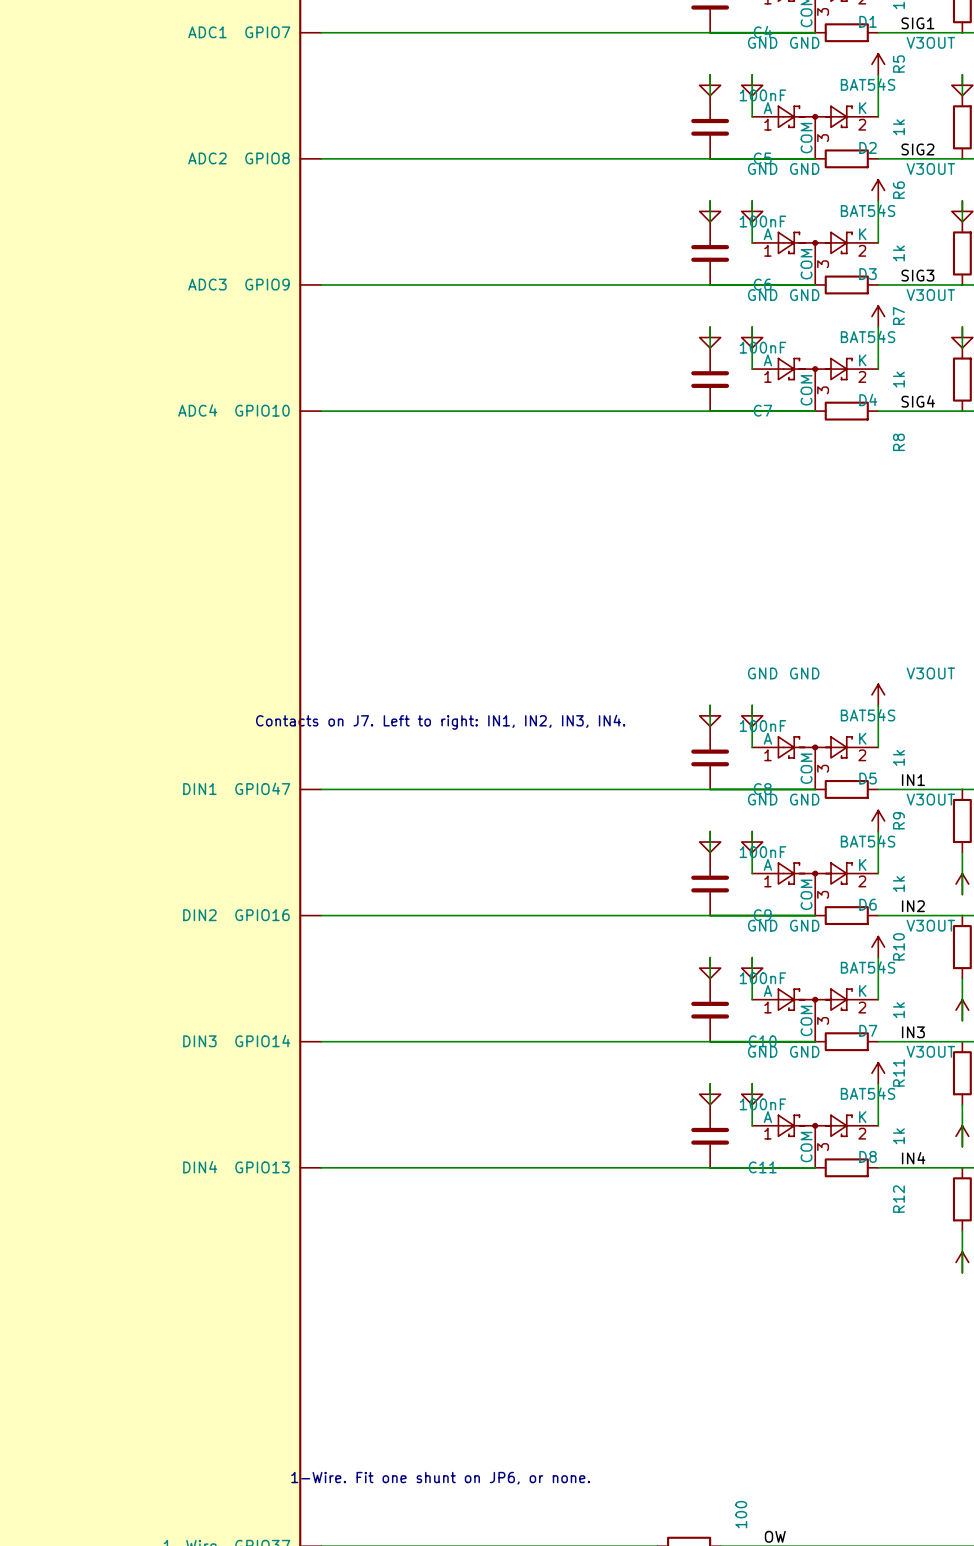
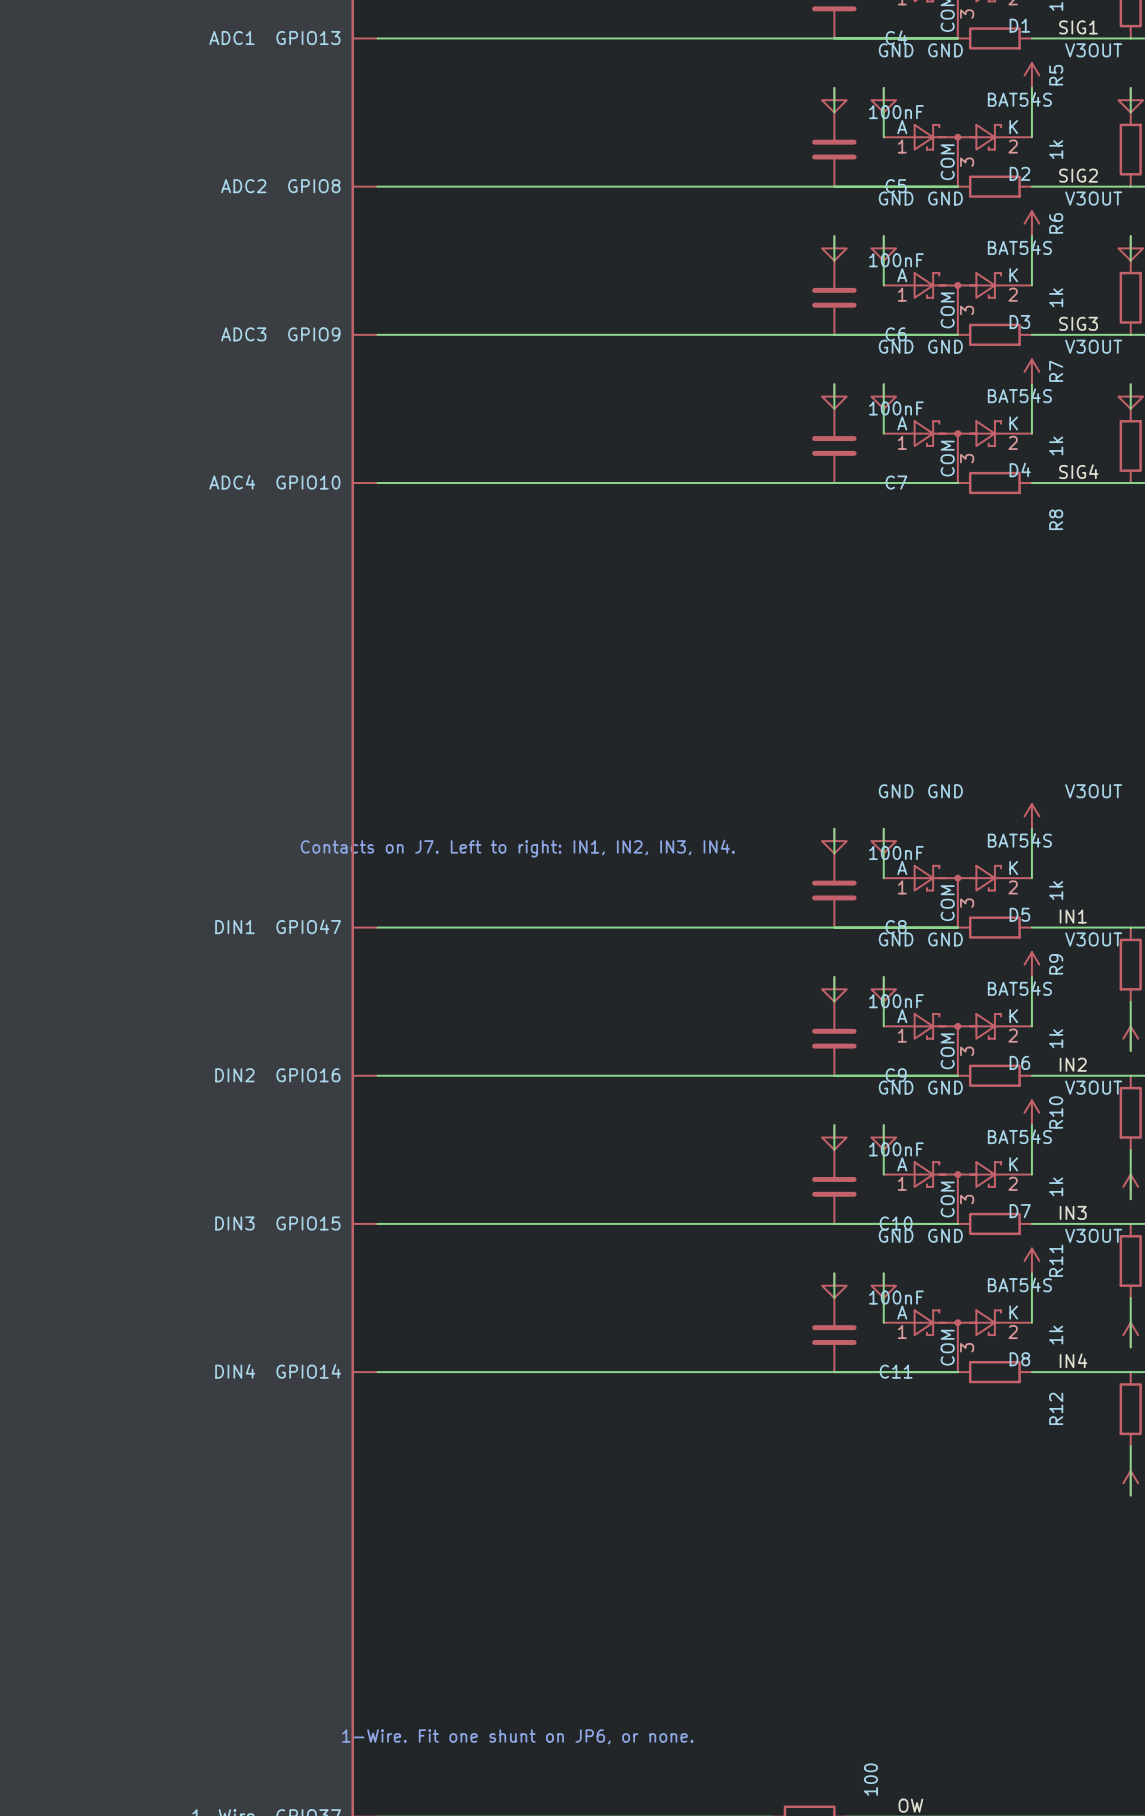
part pin name: ADC1 GPIO7 (239, 32) -> ADC1 GPIO13 (274, 38)
part pin name: DIN3 GPIO14 (236, 1041) -> DIN3 GPIO15 (277, 1223)
part pin name: DIN4 GPIO13 (236, 1167) -> DIN4 GPIO14 (278, 1371)

